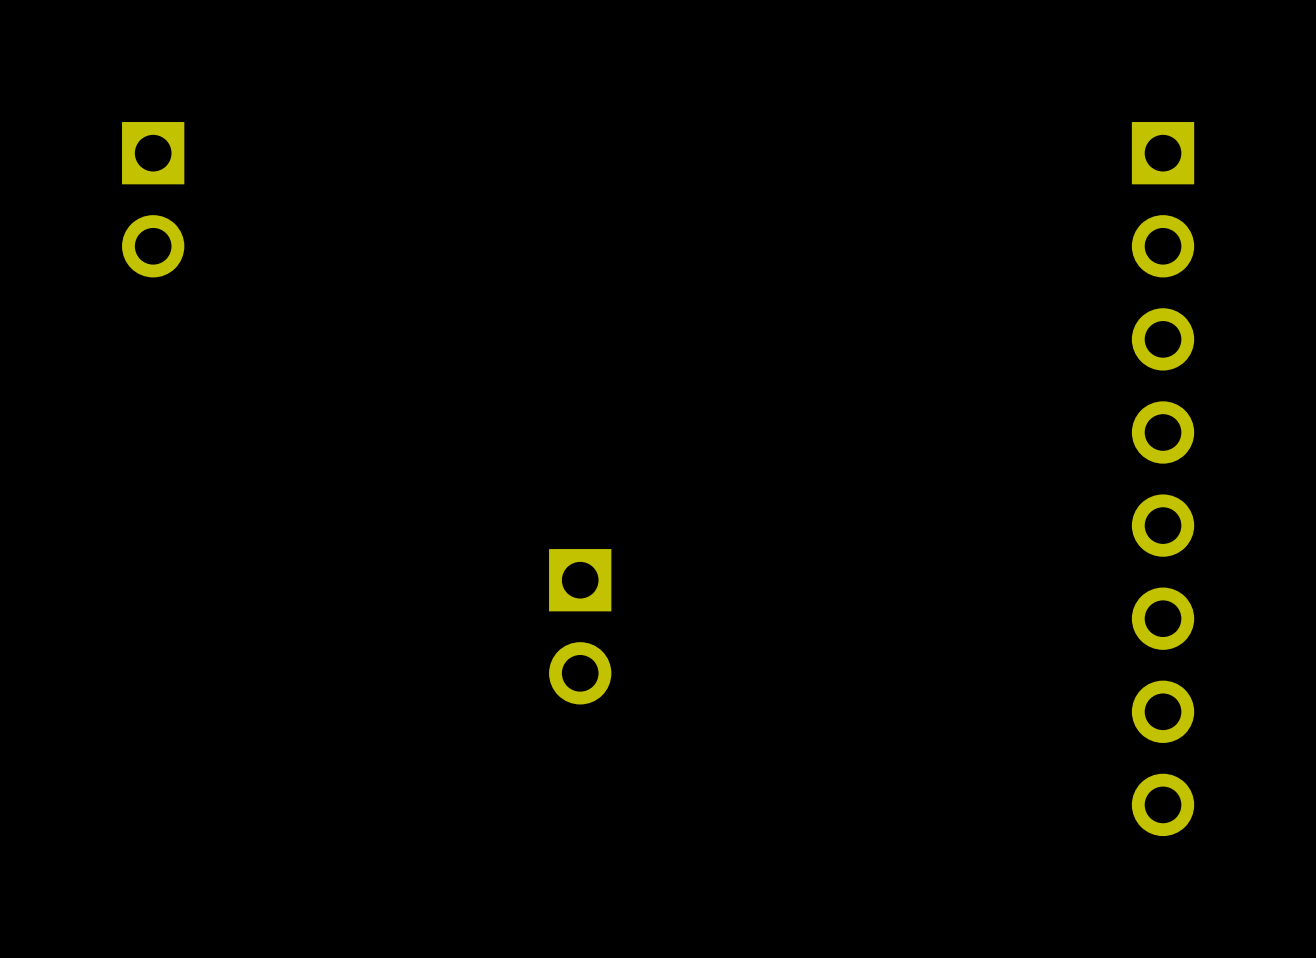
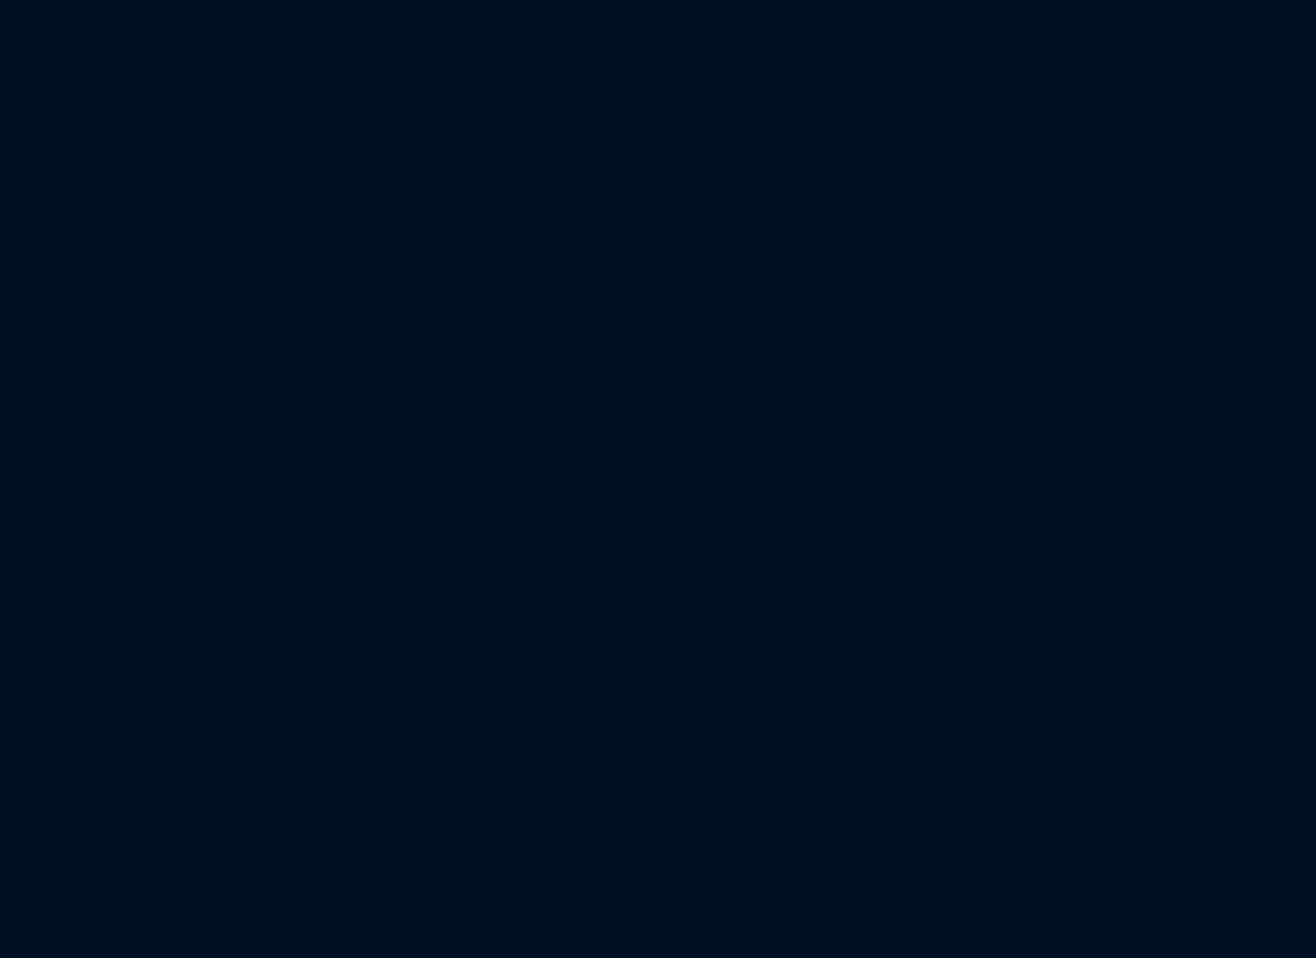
part: (153, 199) -> none
part: (1163, 479) -> none
part: (580, 626) -> none

